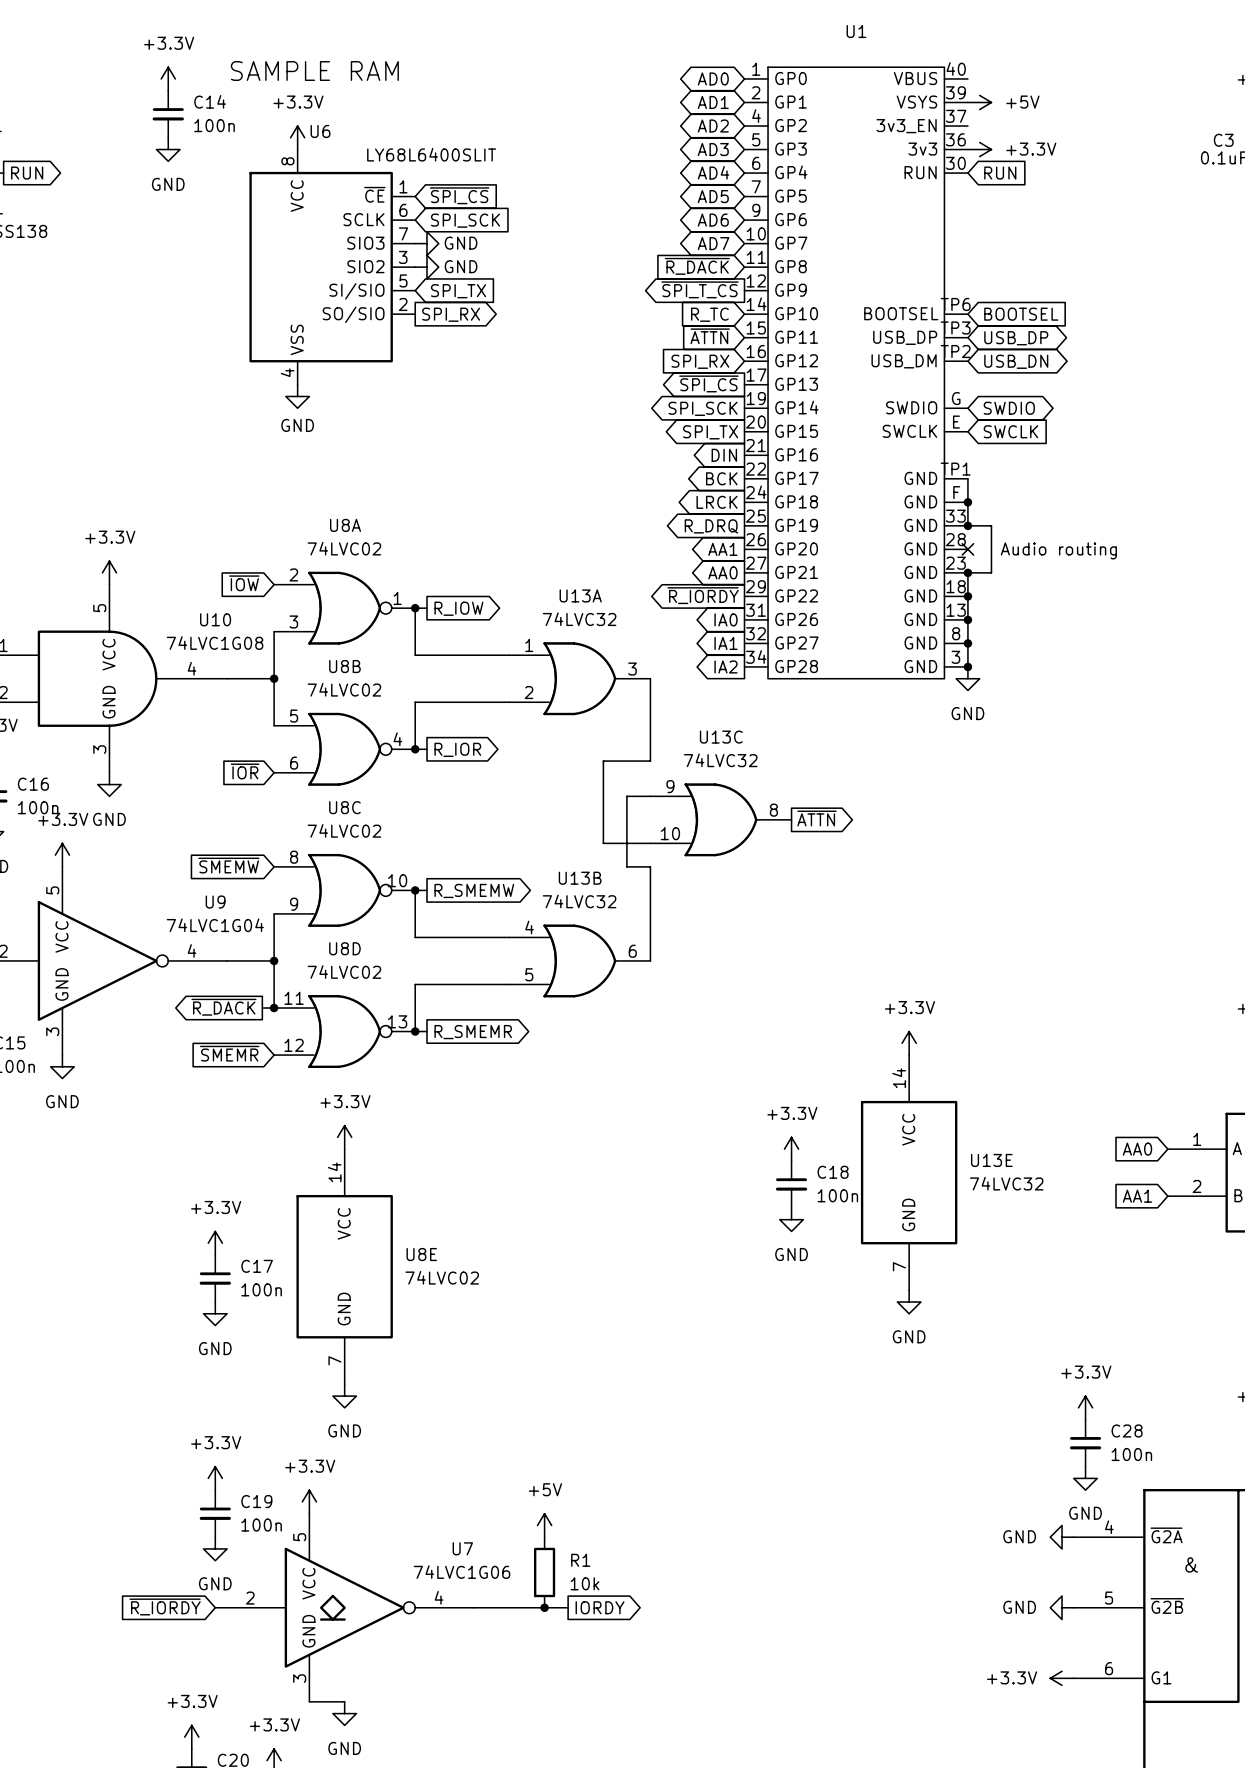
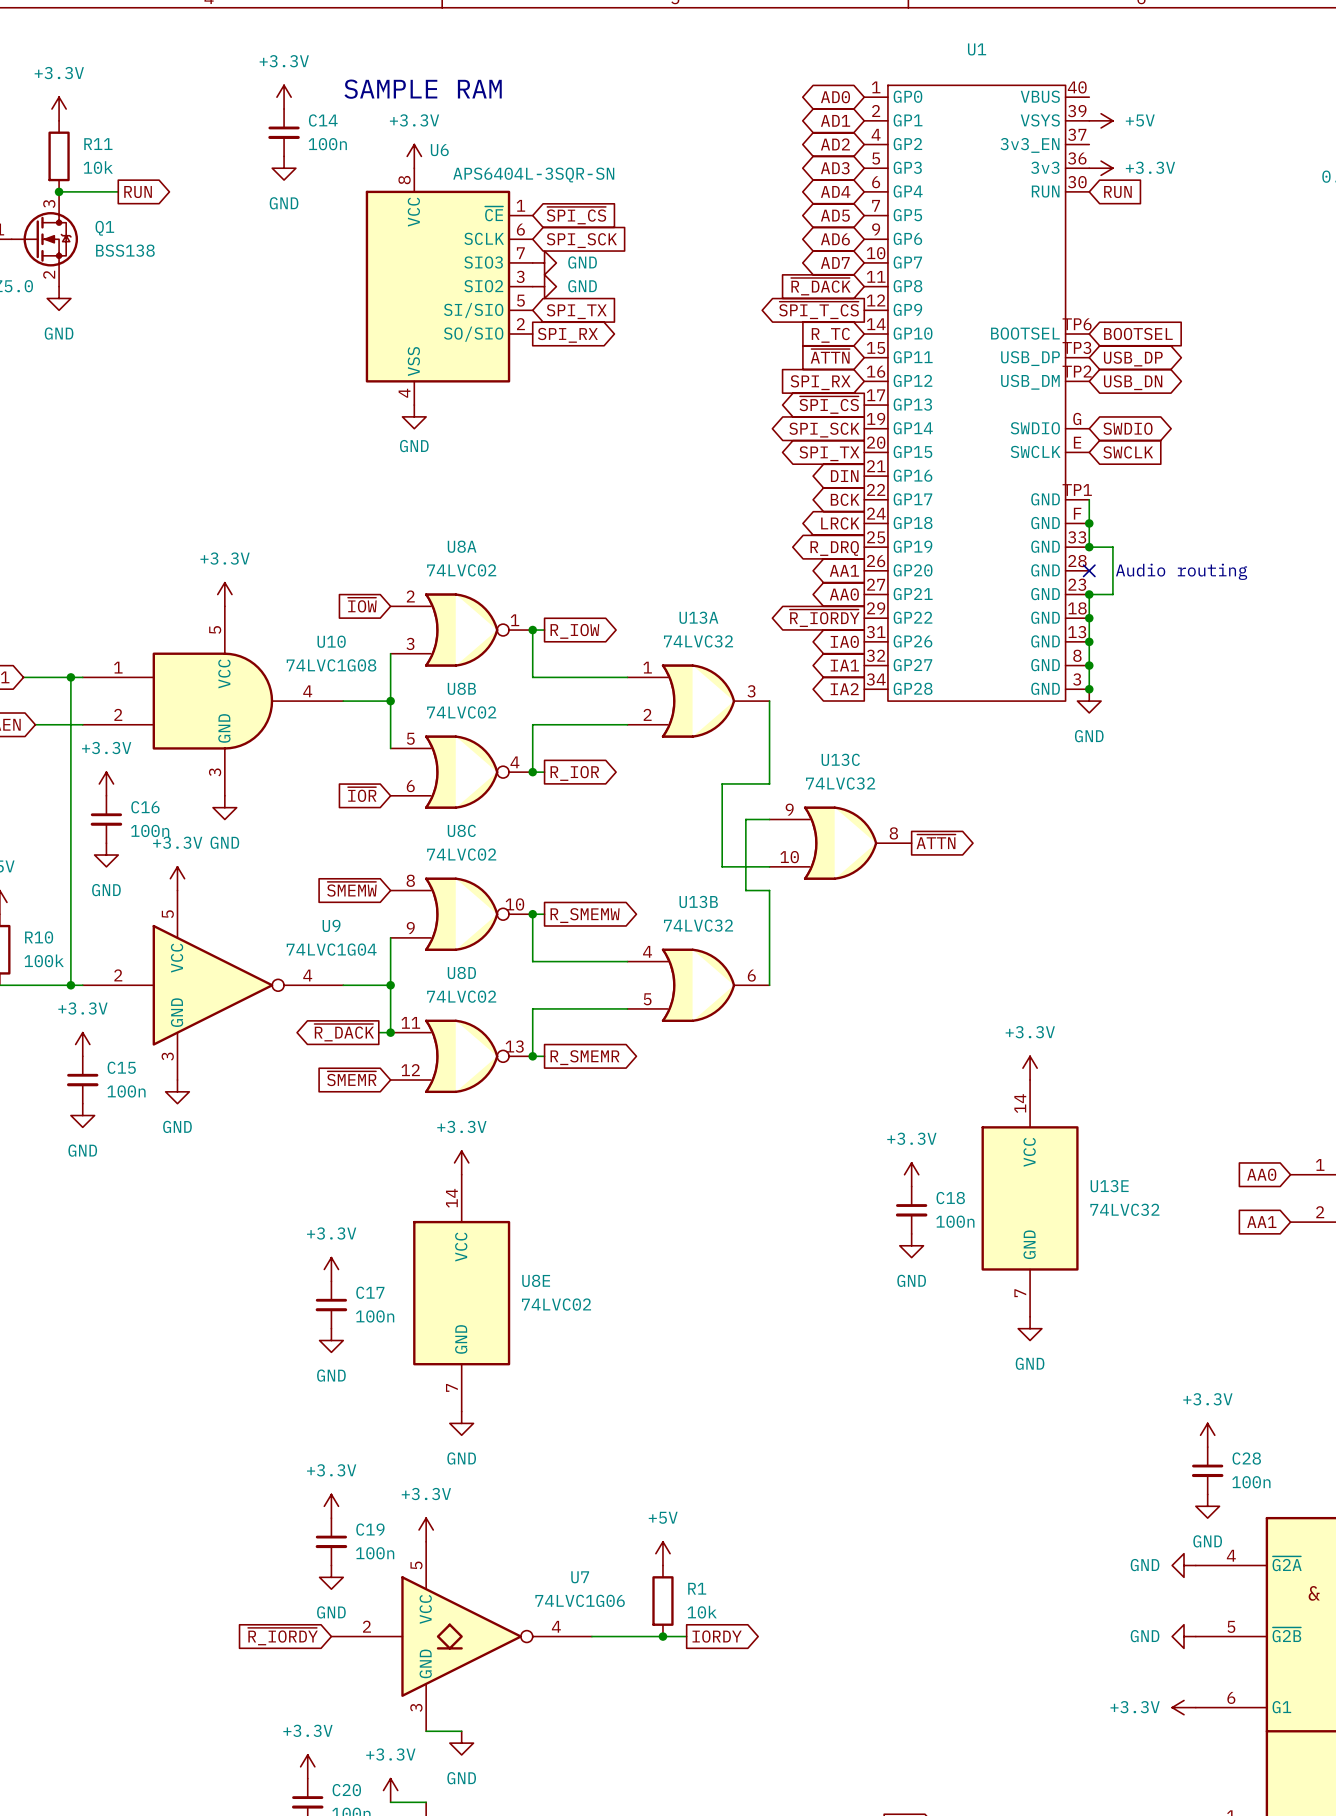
U6 value: LY68L6400SLIT (431, 154) -> APS6404L-3SQR-SN (533, 174)

